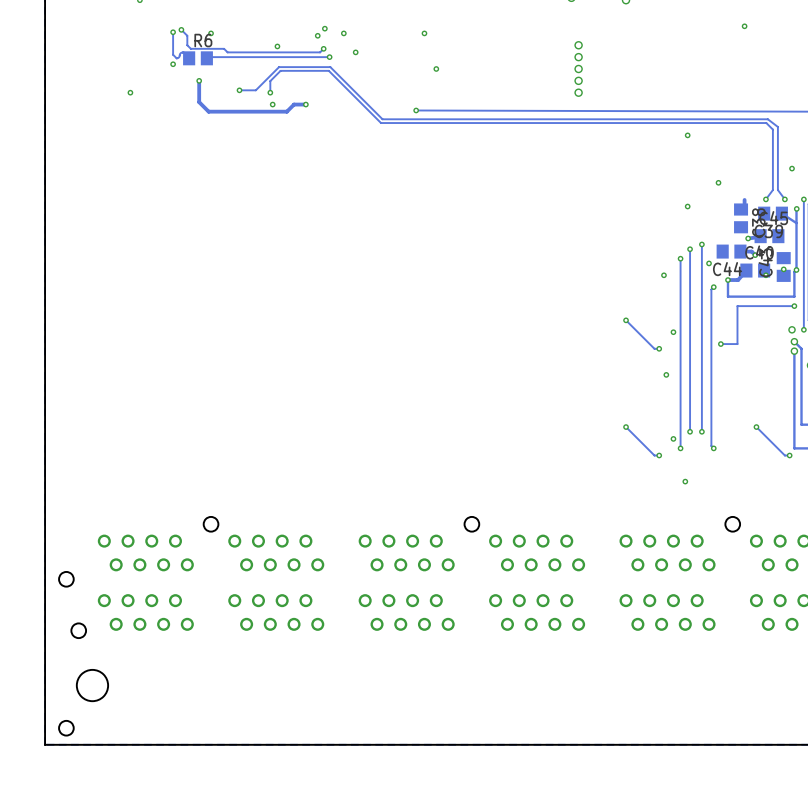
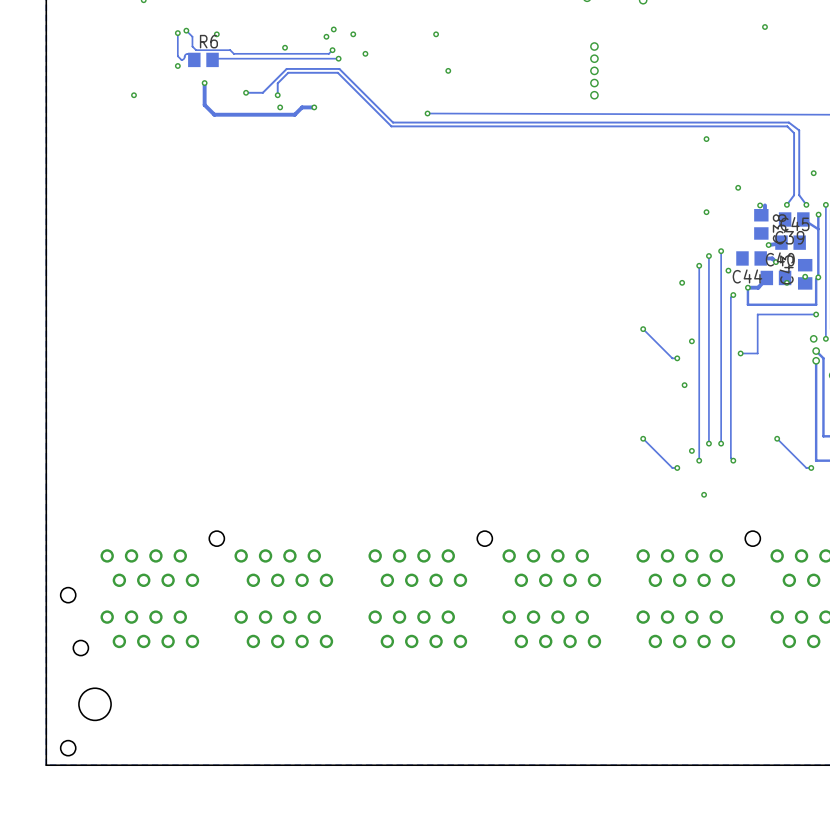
via: none -> (760, 205)

